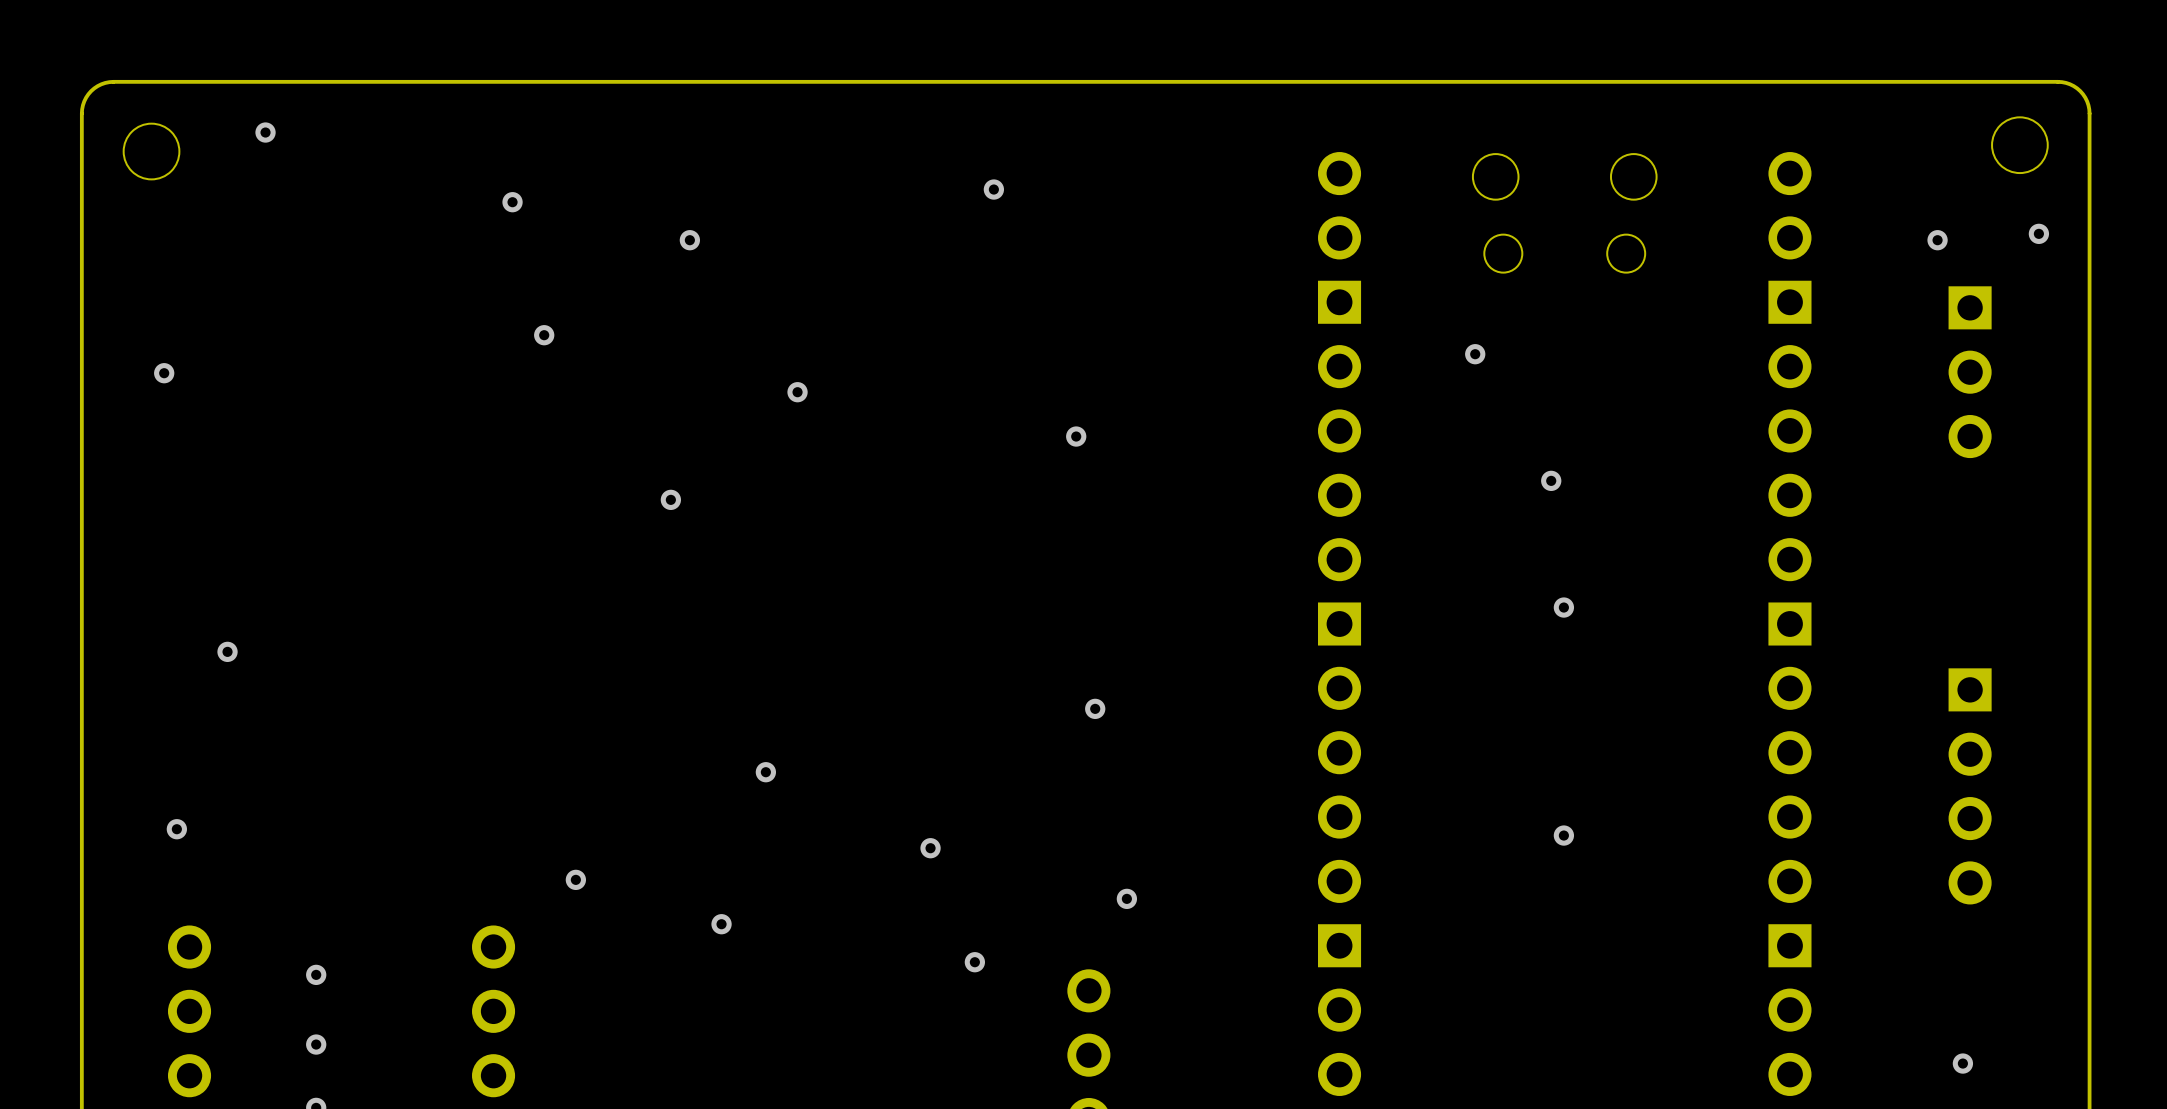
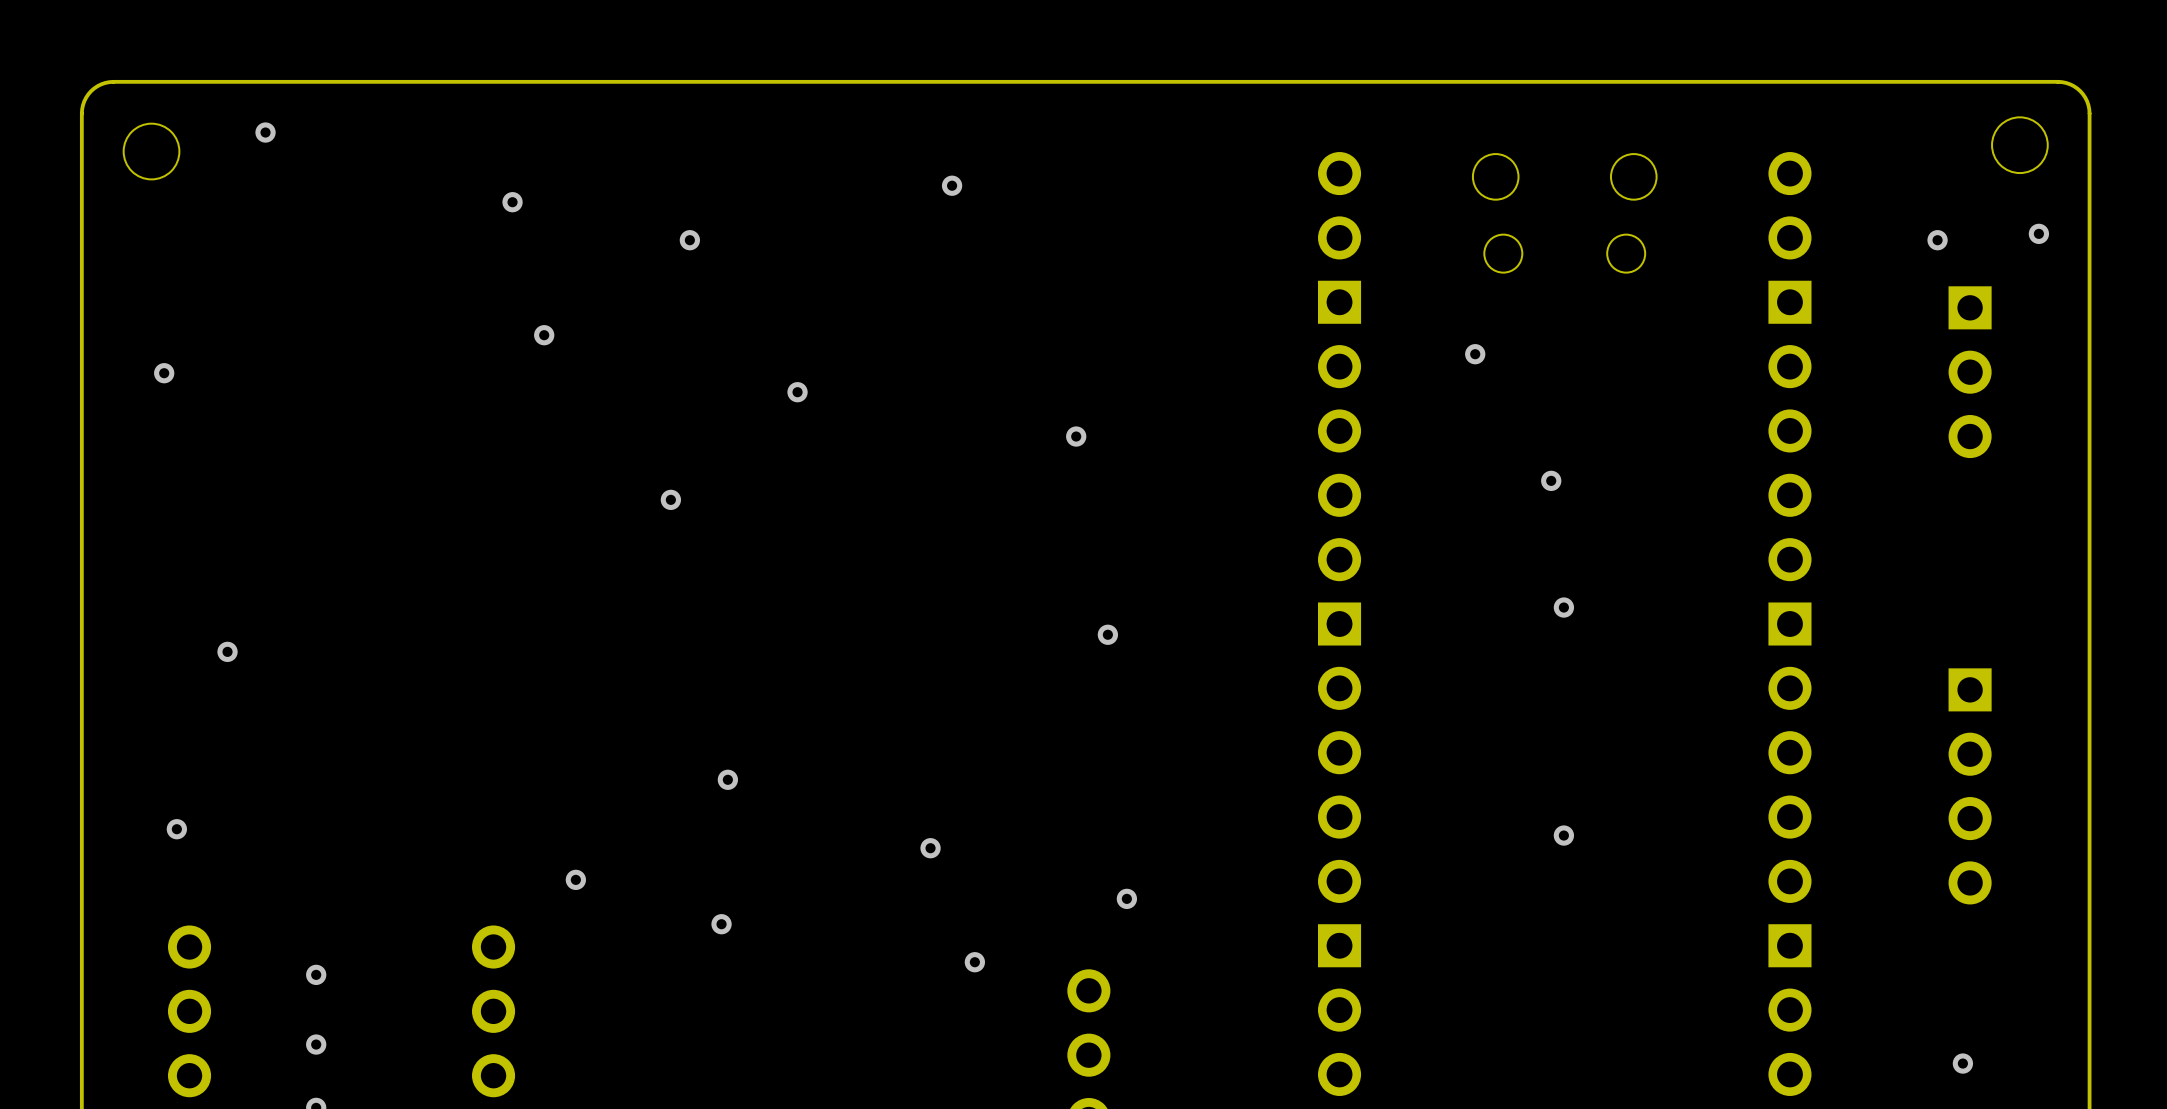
via position: (993, 189) -> (952, 185)
via position: (1095, 708) -> (1107, 634)
via position: (765, 772) -> (727, 779)

